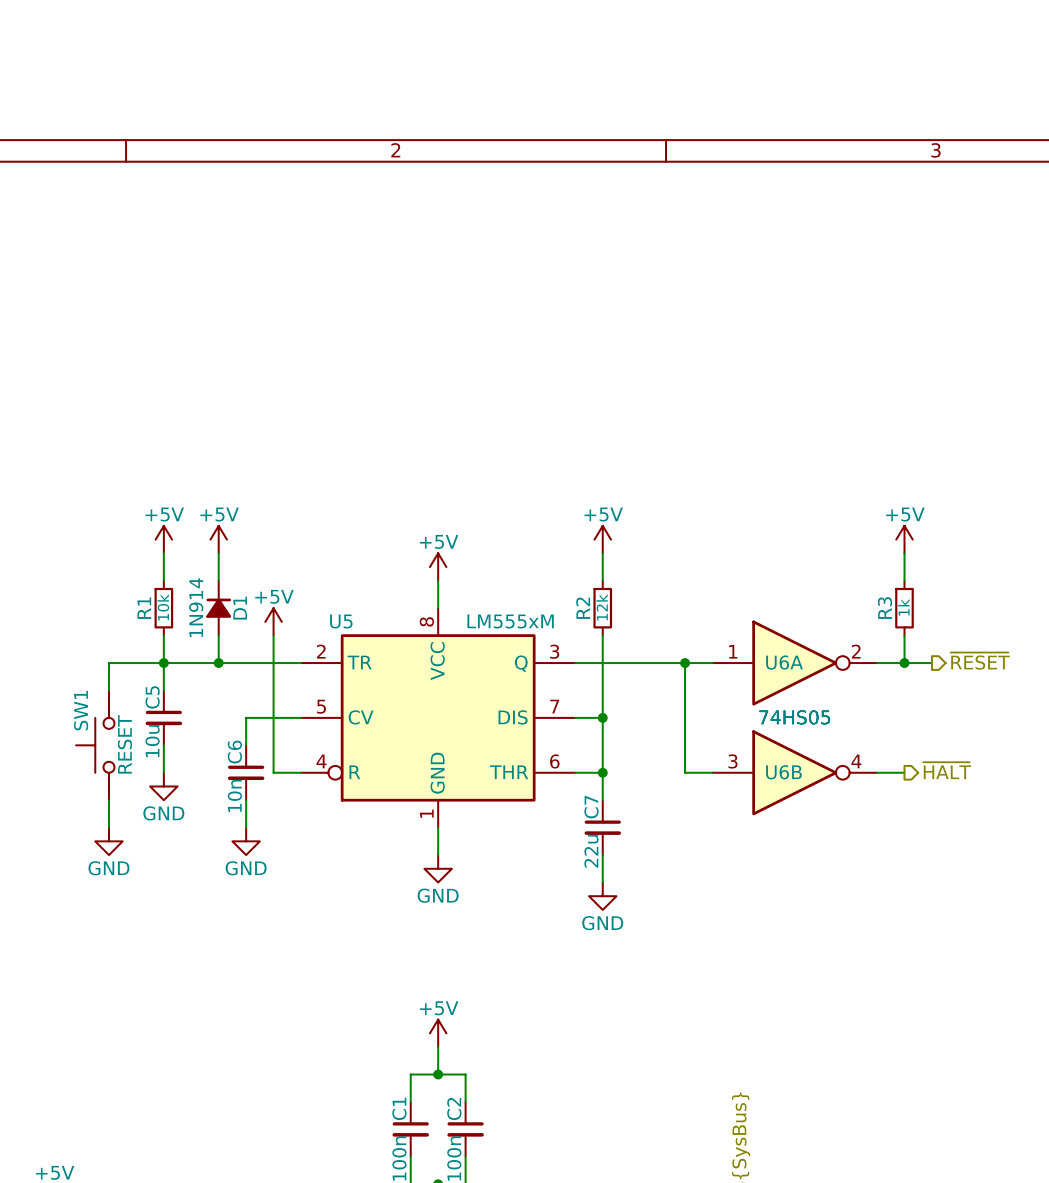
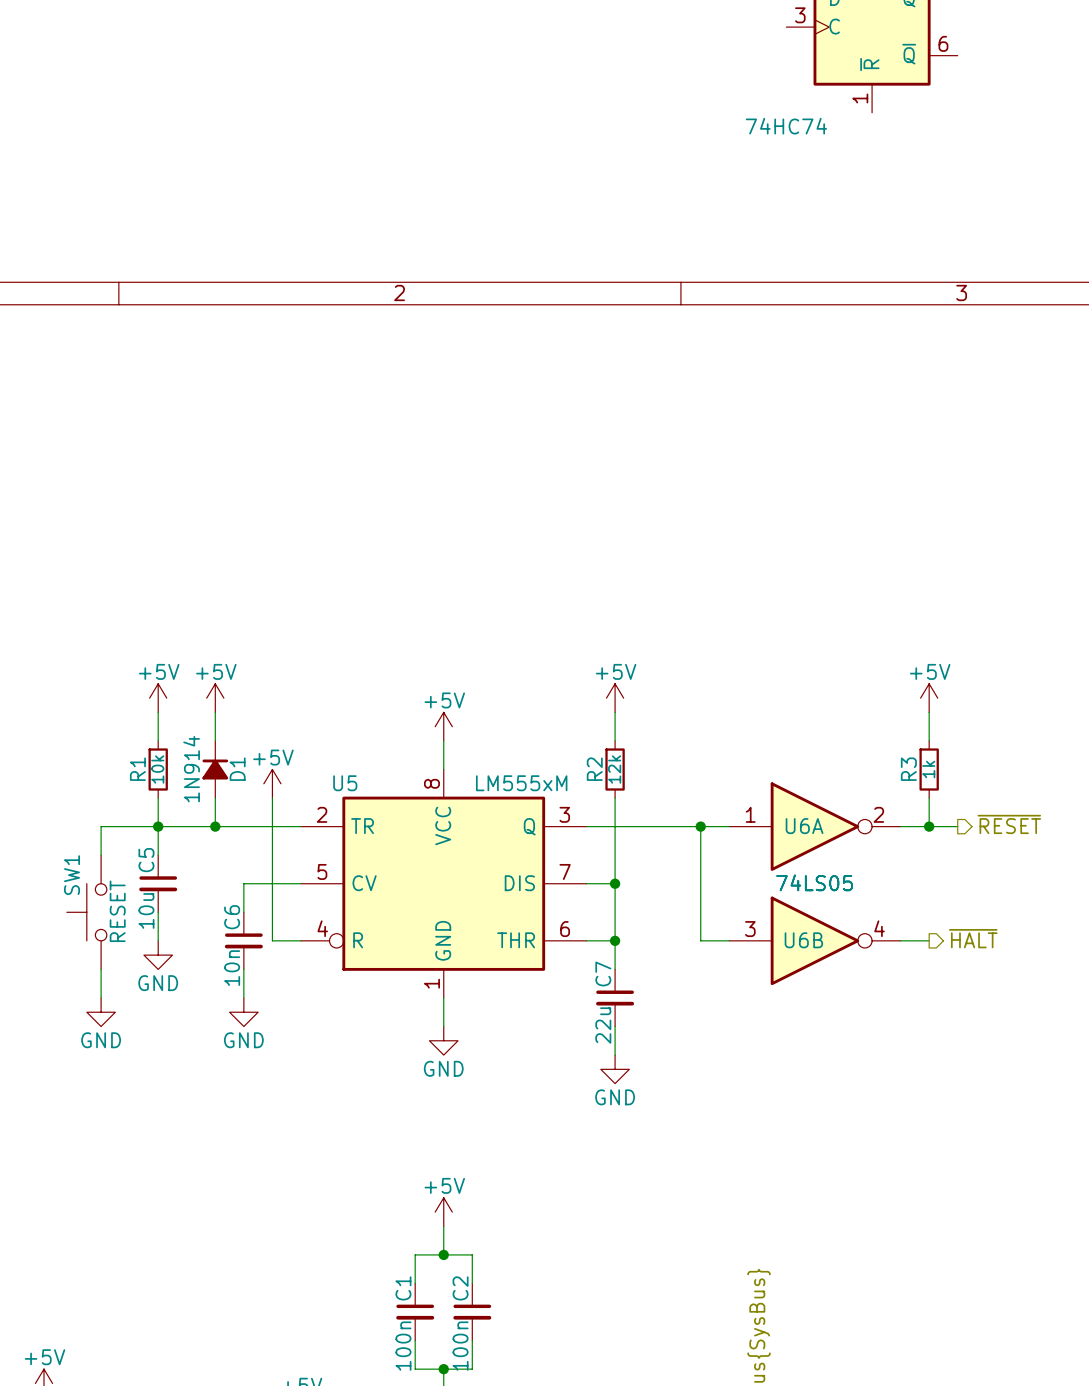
U6A value: 74HS05 (794, 717) -> 74LS05 (814, 882)
U6B value: 74HS05 (794, 717) -> 74LS05 (814, 882)

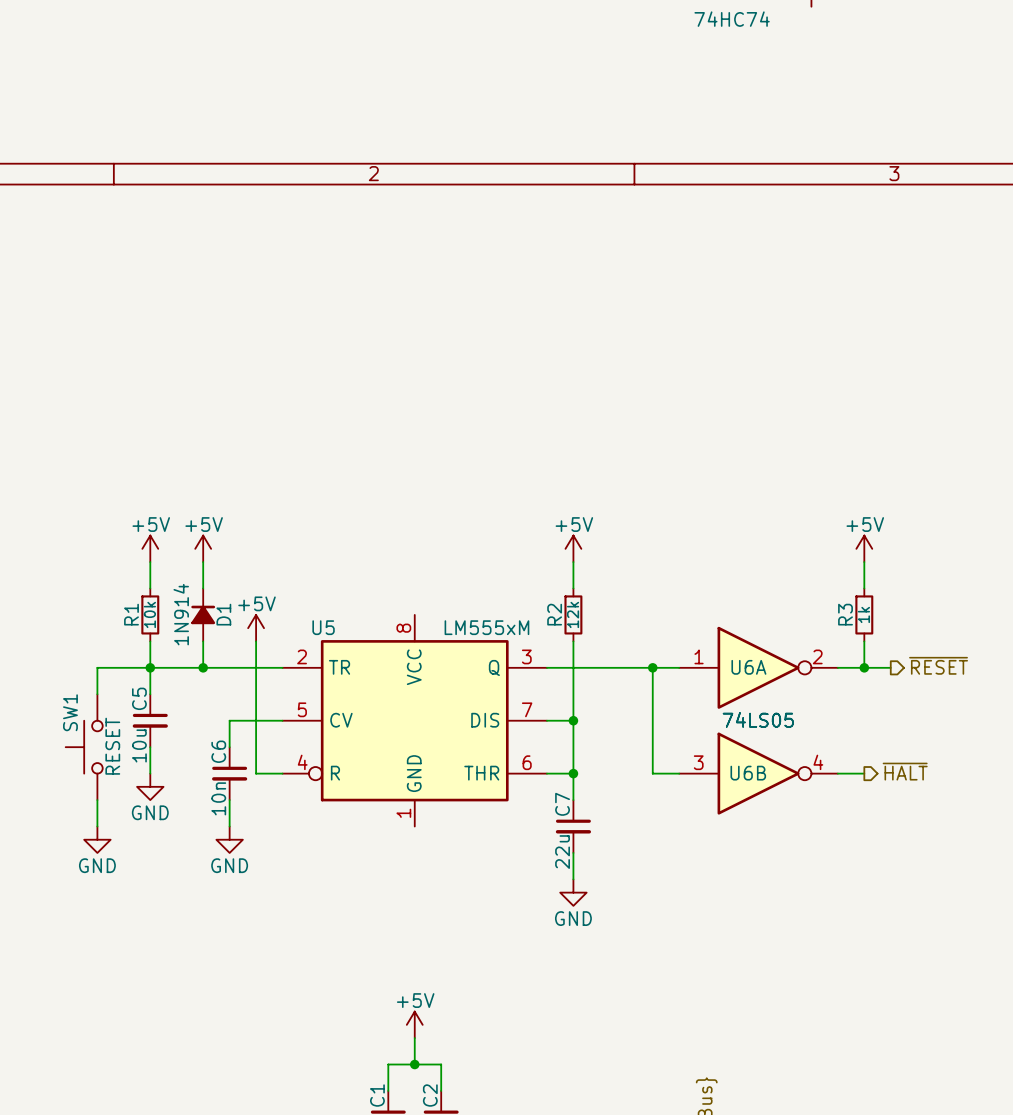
power symbol: +5V (443, 726) -> none
wire: (443, 740) (443, 769) -> none
wire: (443, 997) (443, 1026) -> none
power symbol: GND (443, 1040) -> none

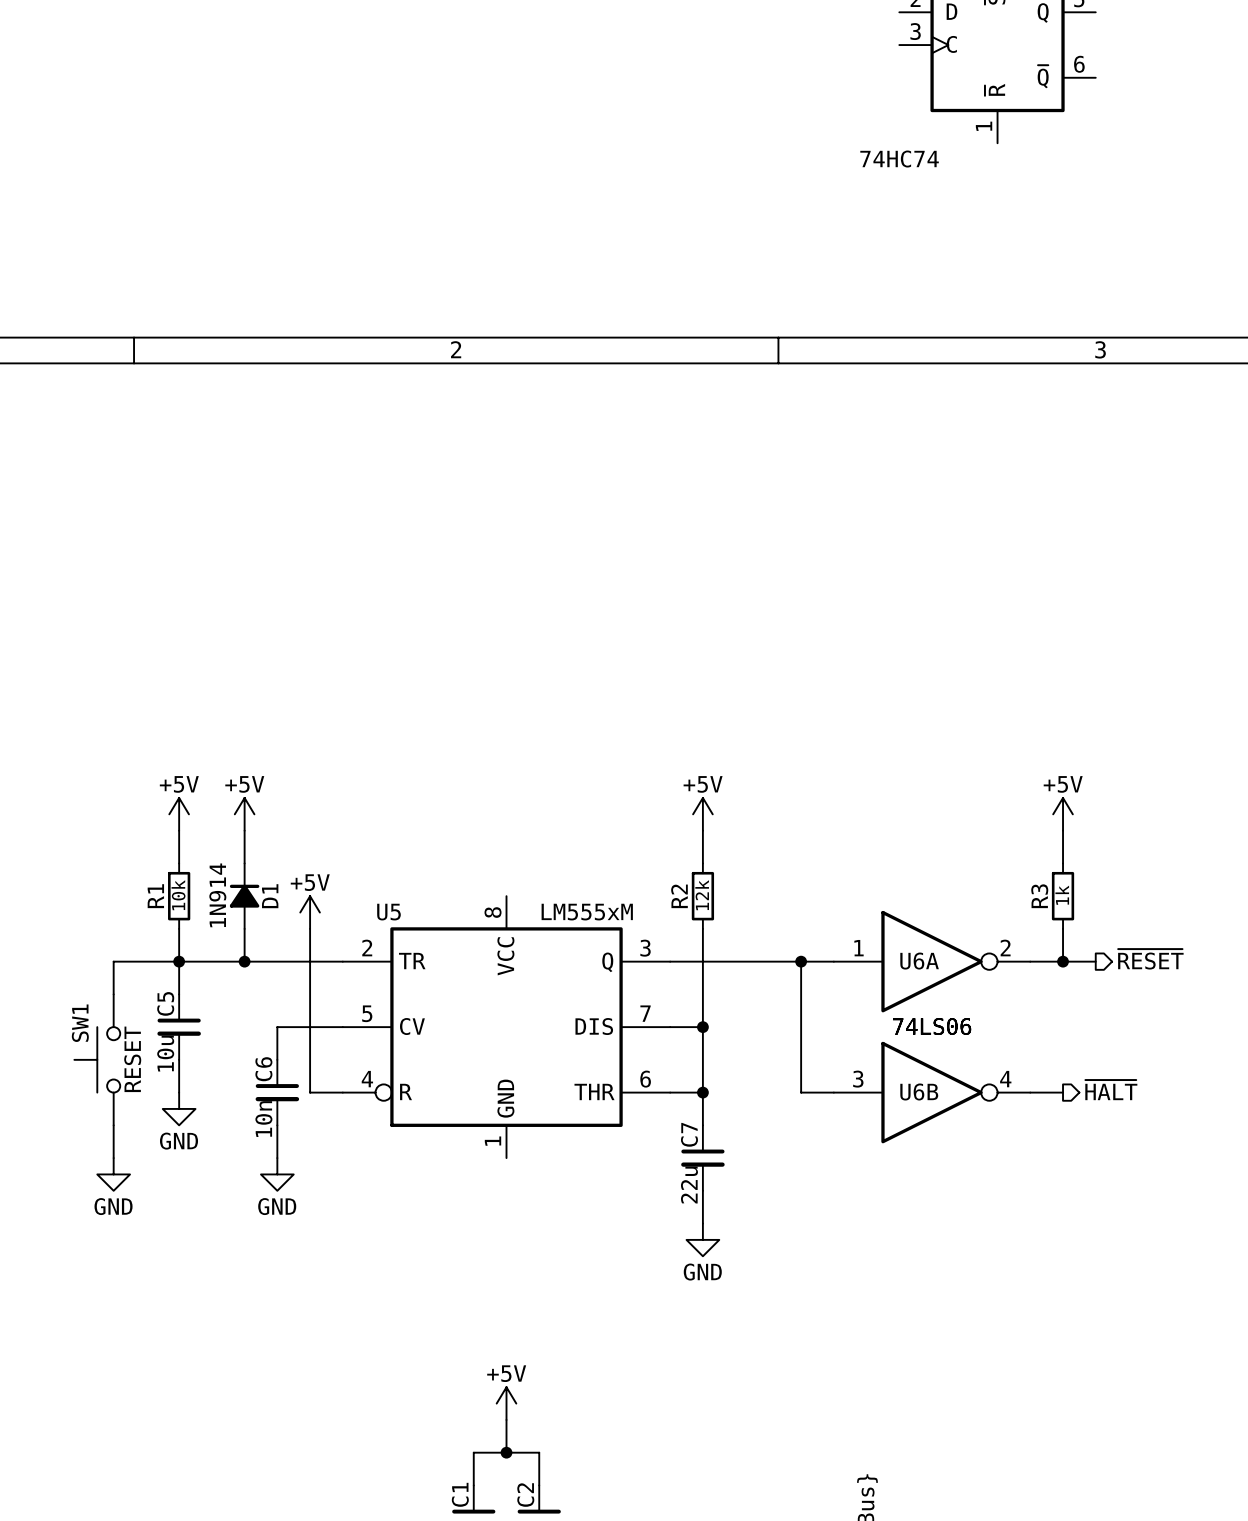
U6A value: 74LS05 (758, 719) -> 74LS06 (932, 1026)
U6B value: 74LS05 (758, 719) -> 74LS06 (932, 1026)

